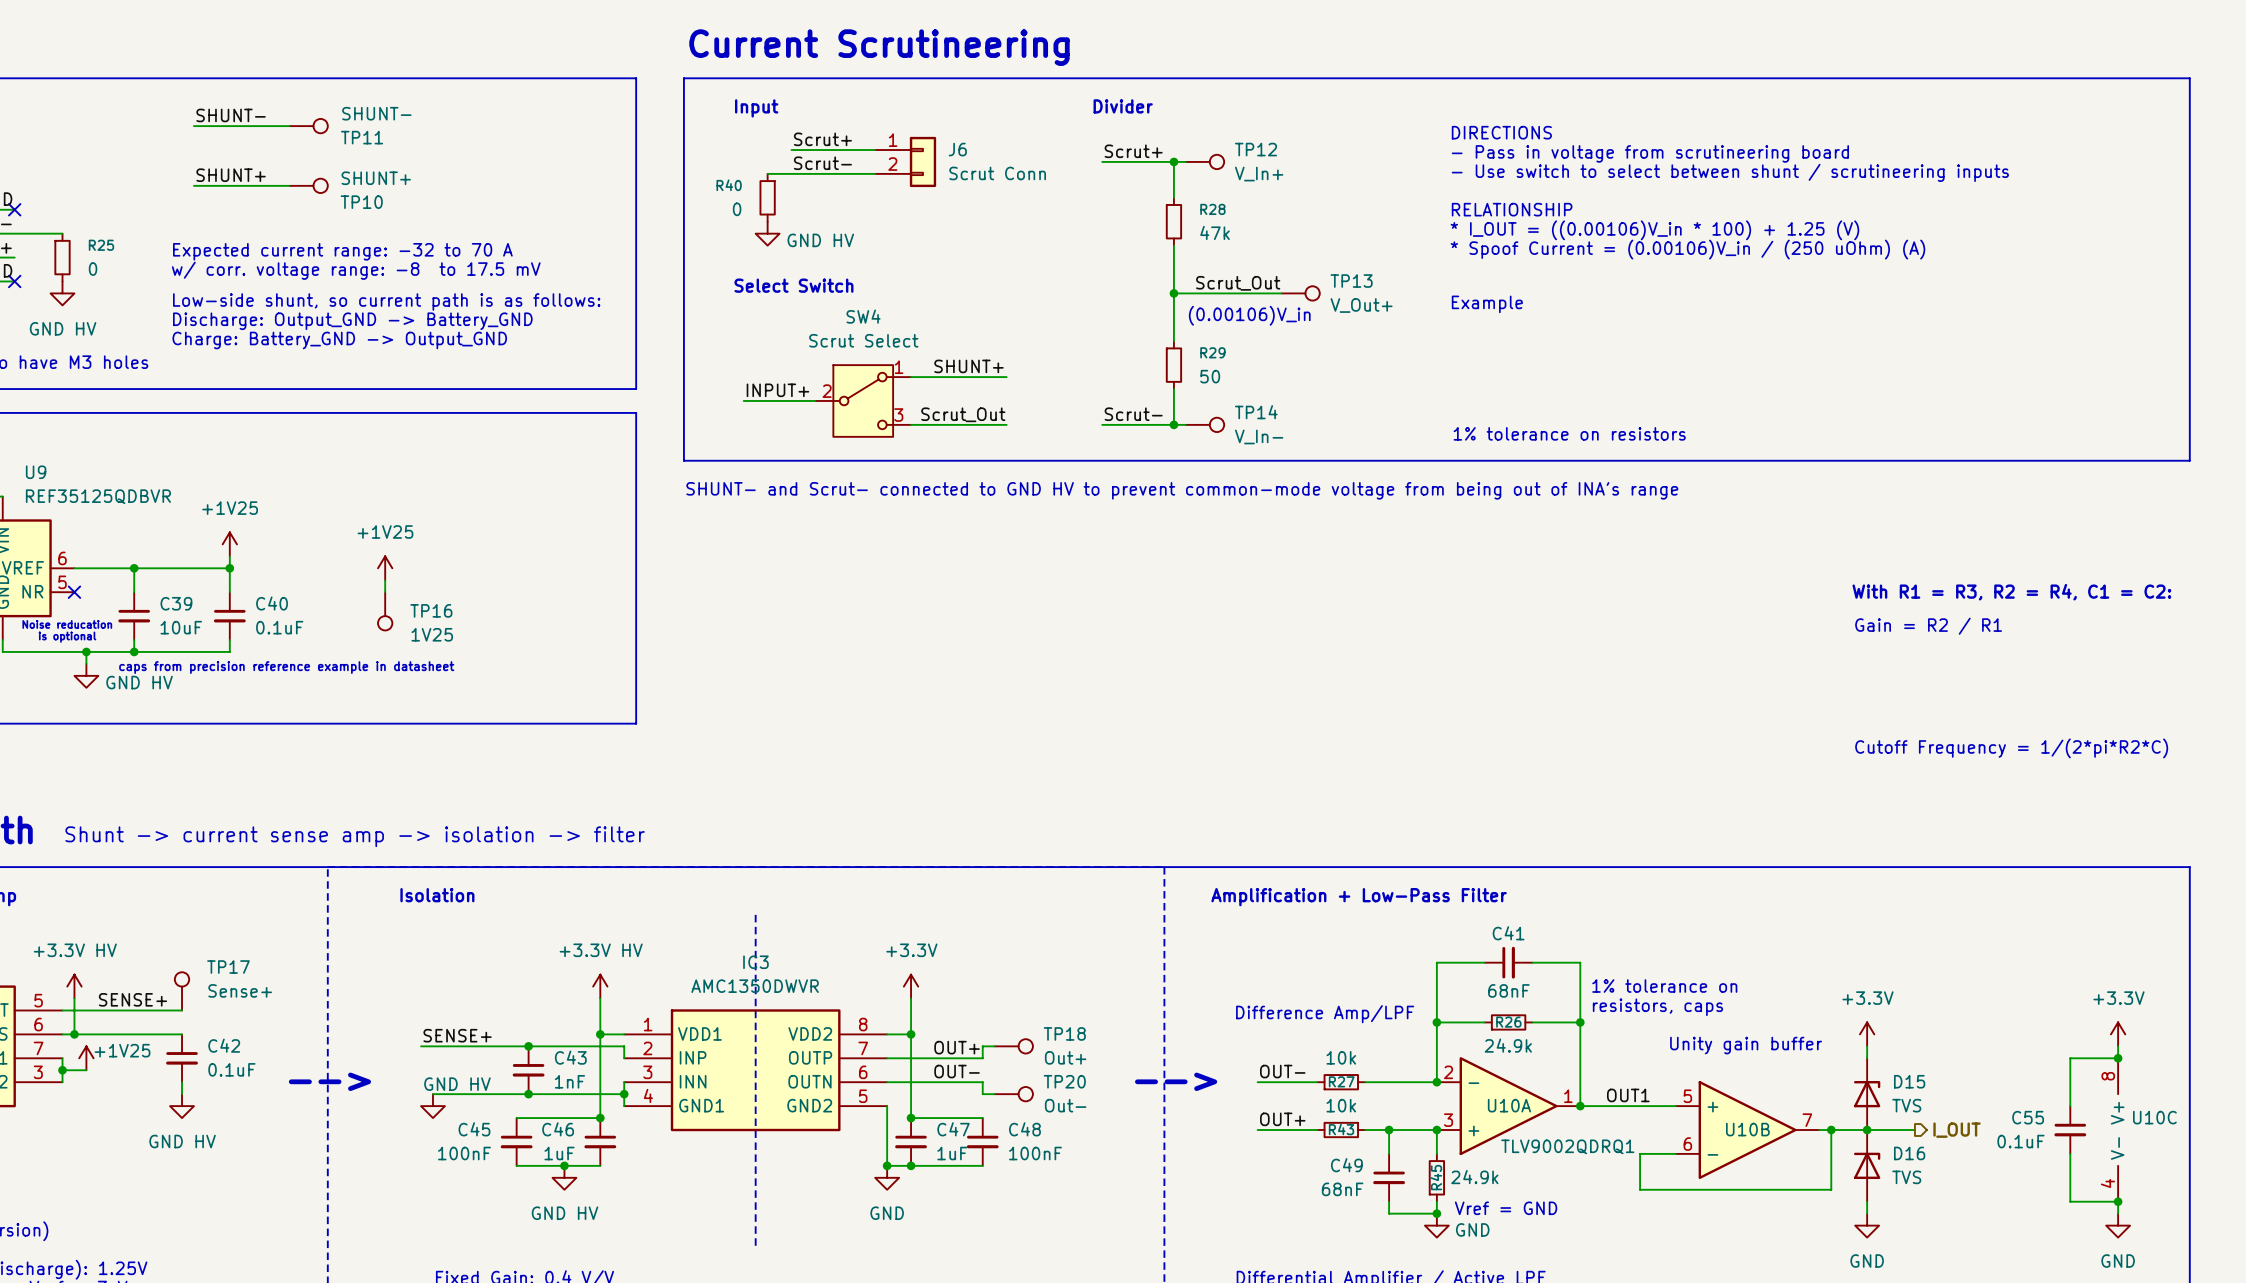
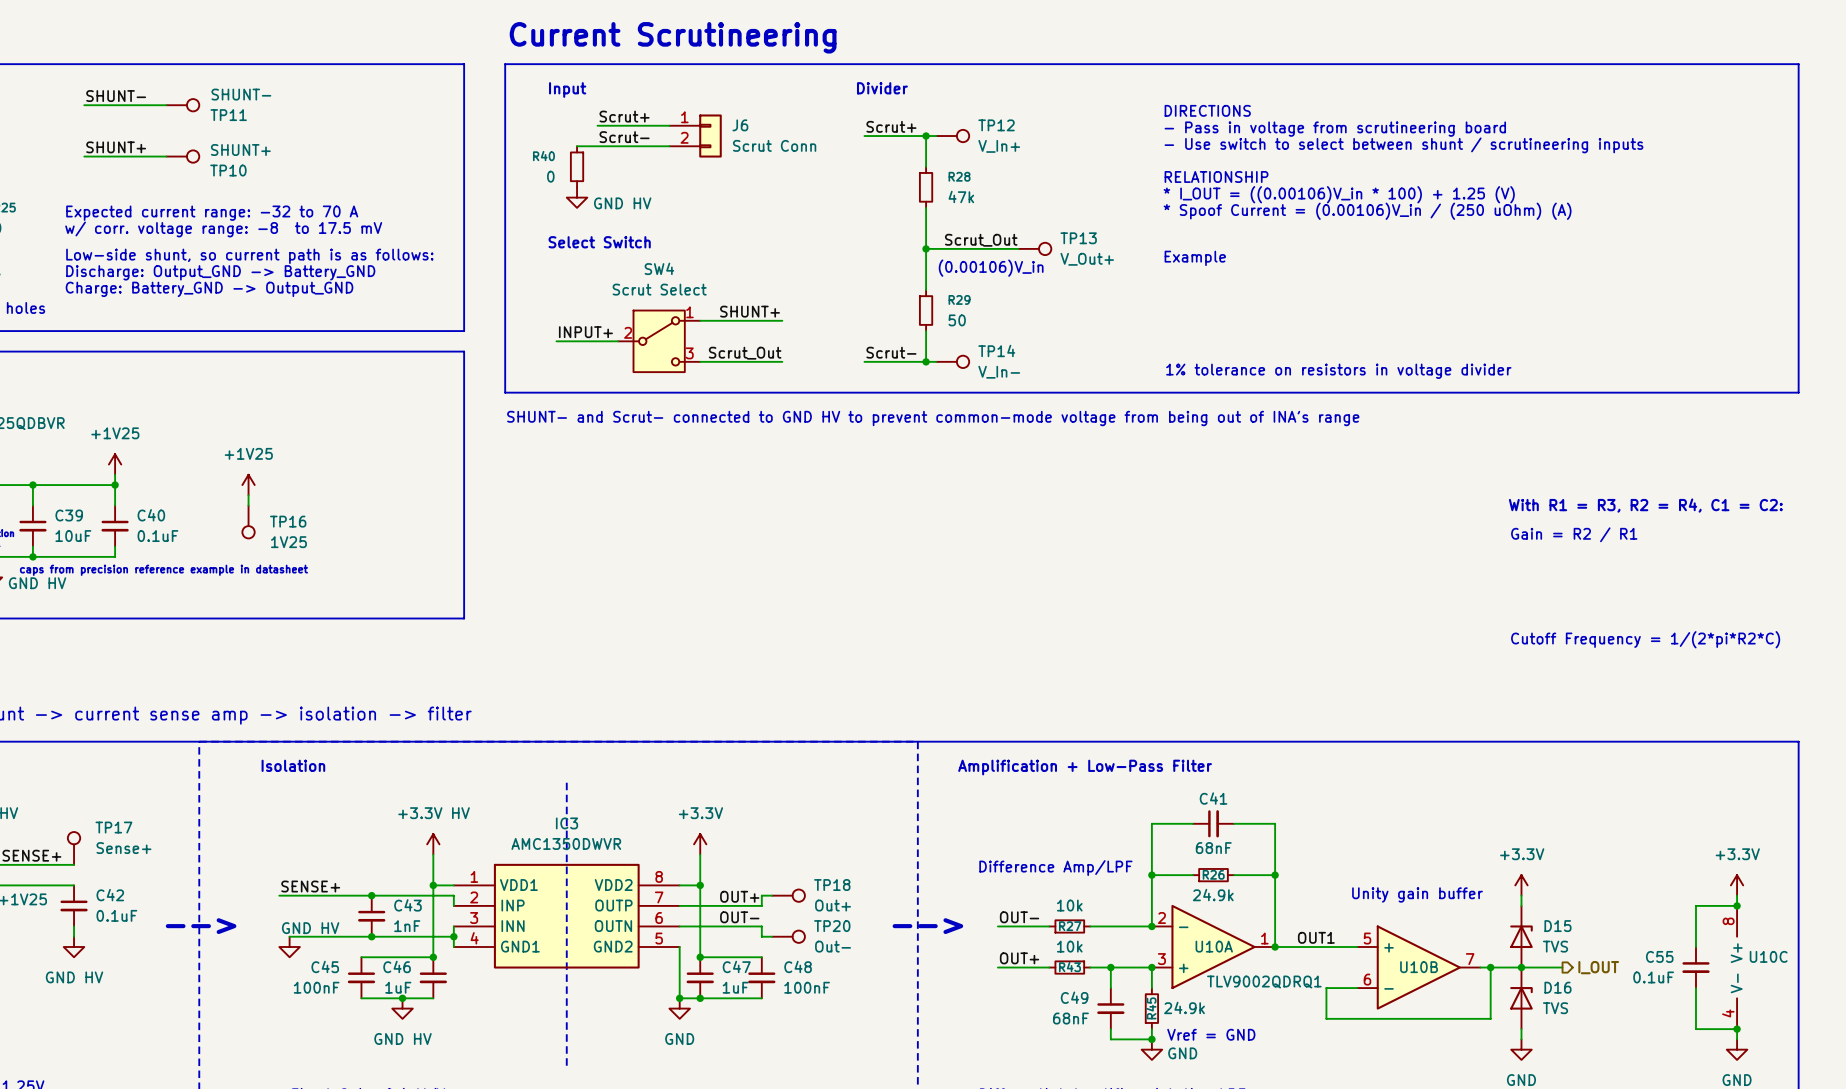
text: 1% tolerance on resistors (1569, 433) -> 1% tolerance on resistors in voltage divider (1338, 371)
text: 1% tolerance on (1664, 986) -> none
text: resistors, caps (1657, 1007) -> none

